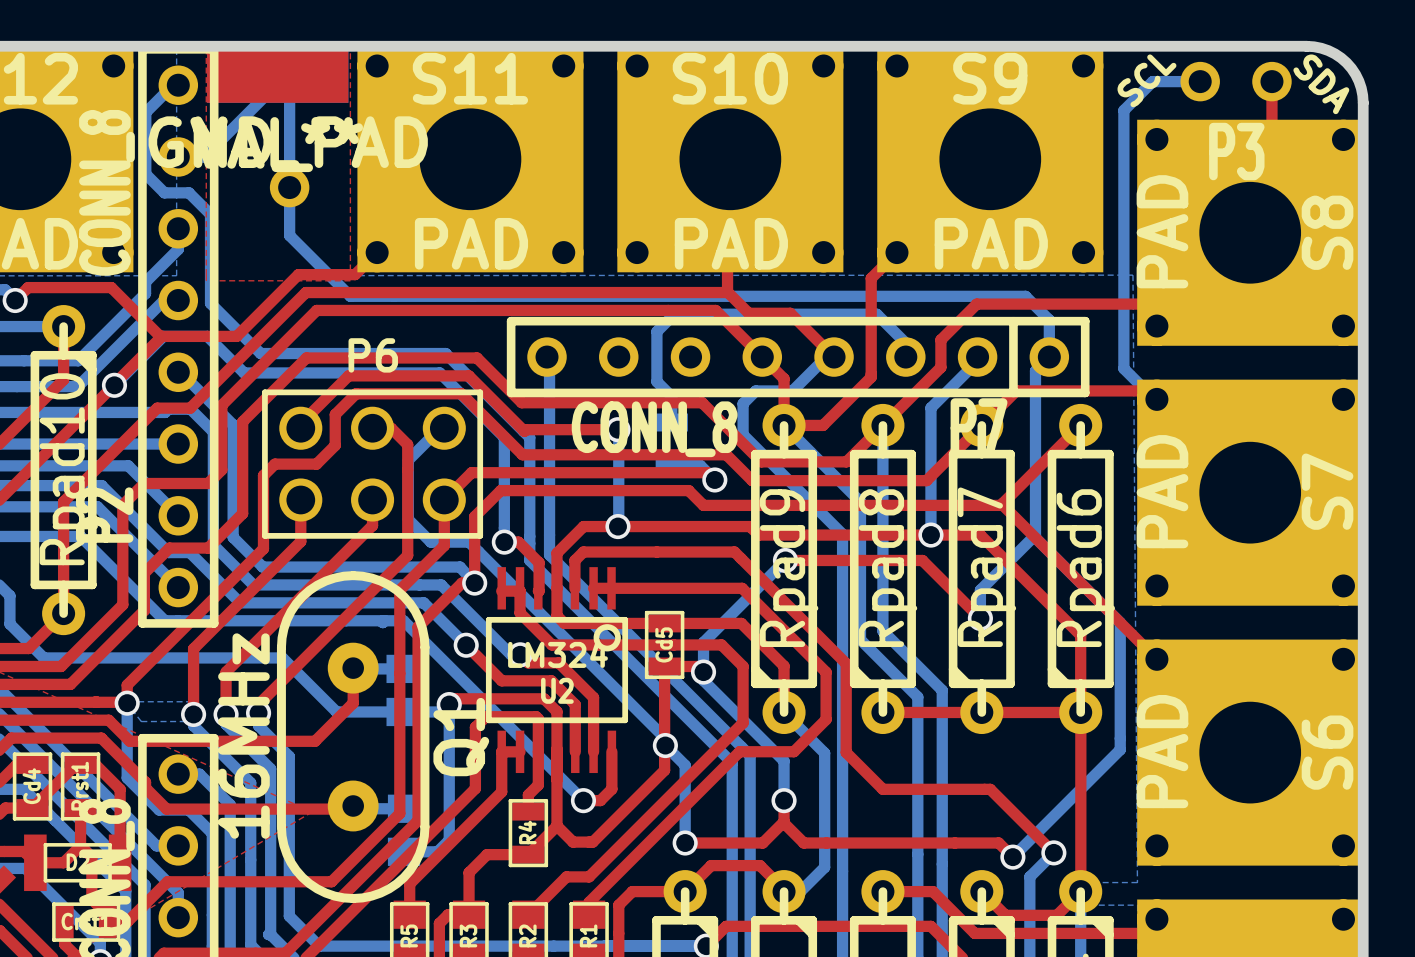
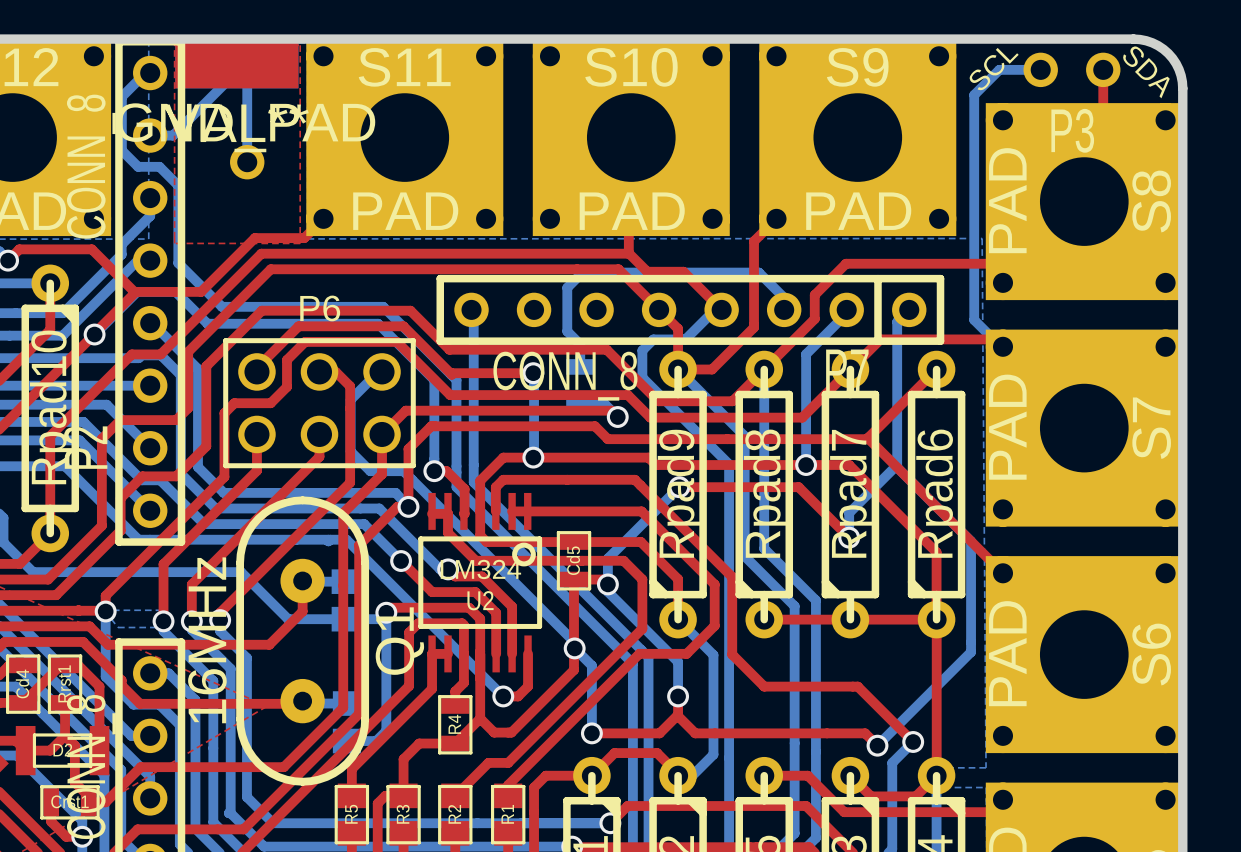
bottom track: (289, 187) (289, 235) (350, 296) (1025, 296) (1049, 320) (1049, 357) -> none

